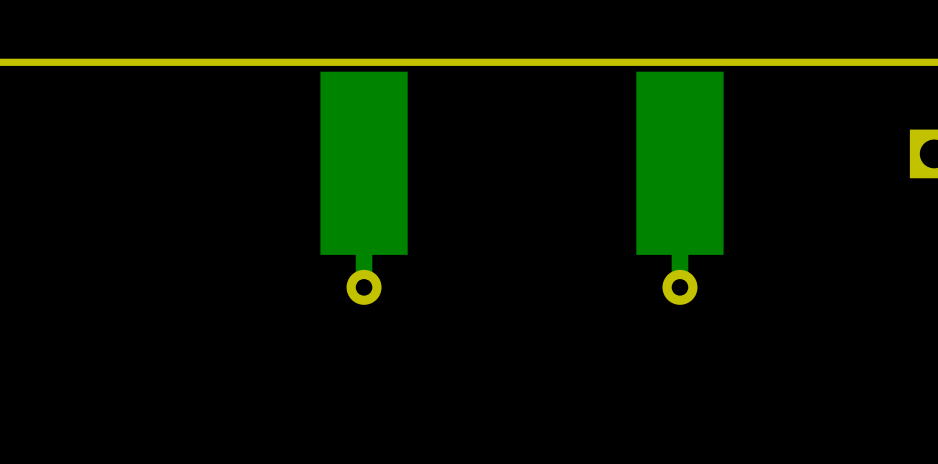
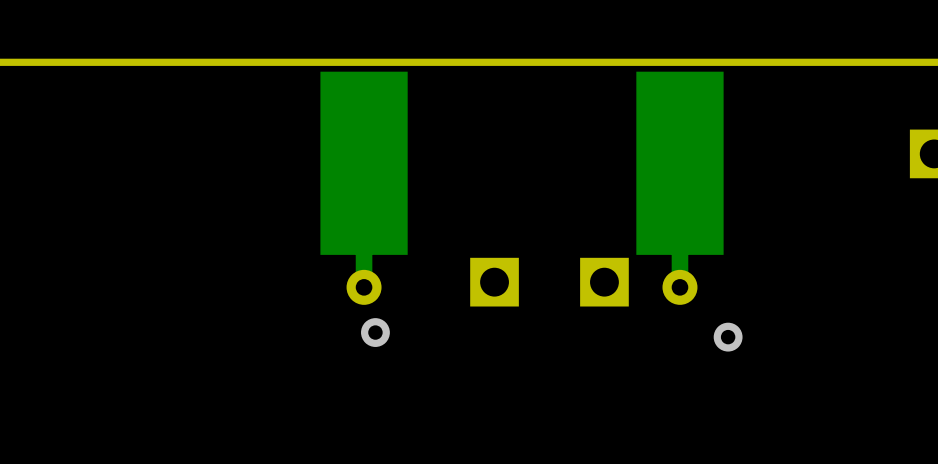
part: none -> (494, 282)
part: none -> (604, 282)
via: none -> (375, 332)
via: none -> (728, 337)

